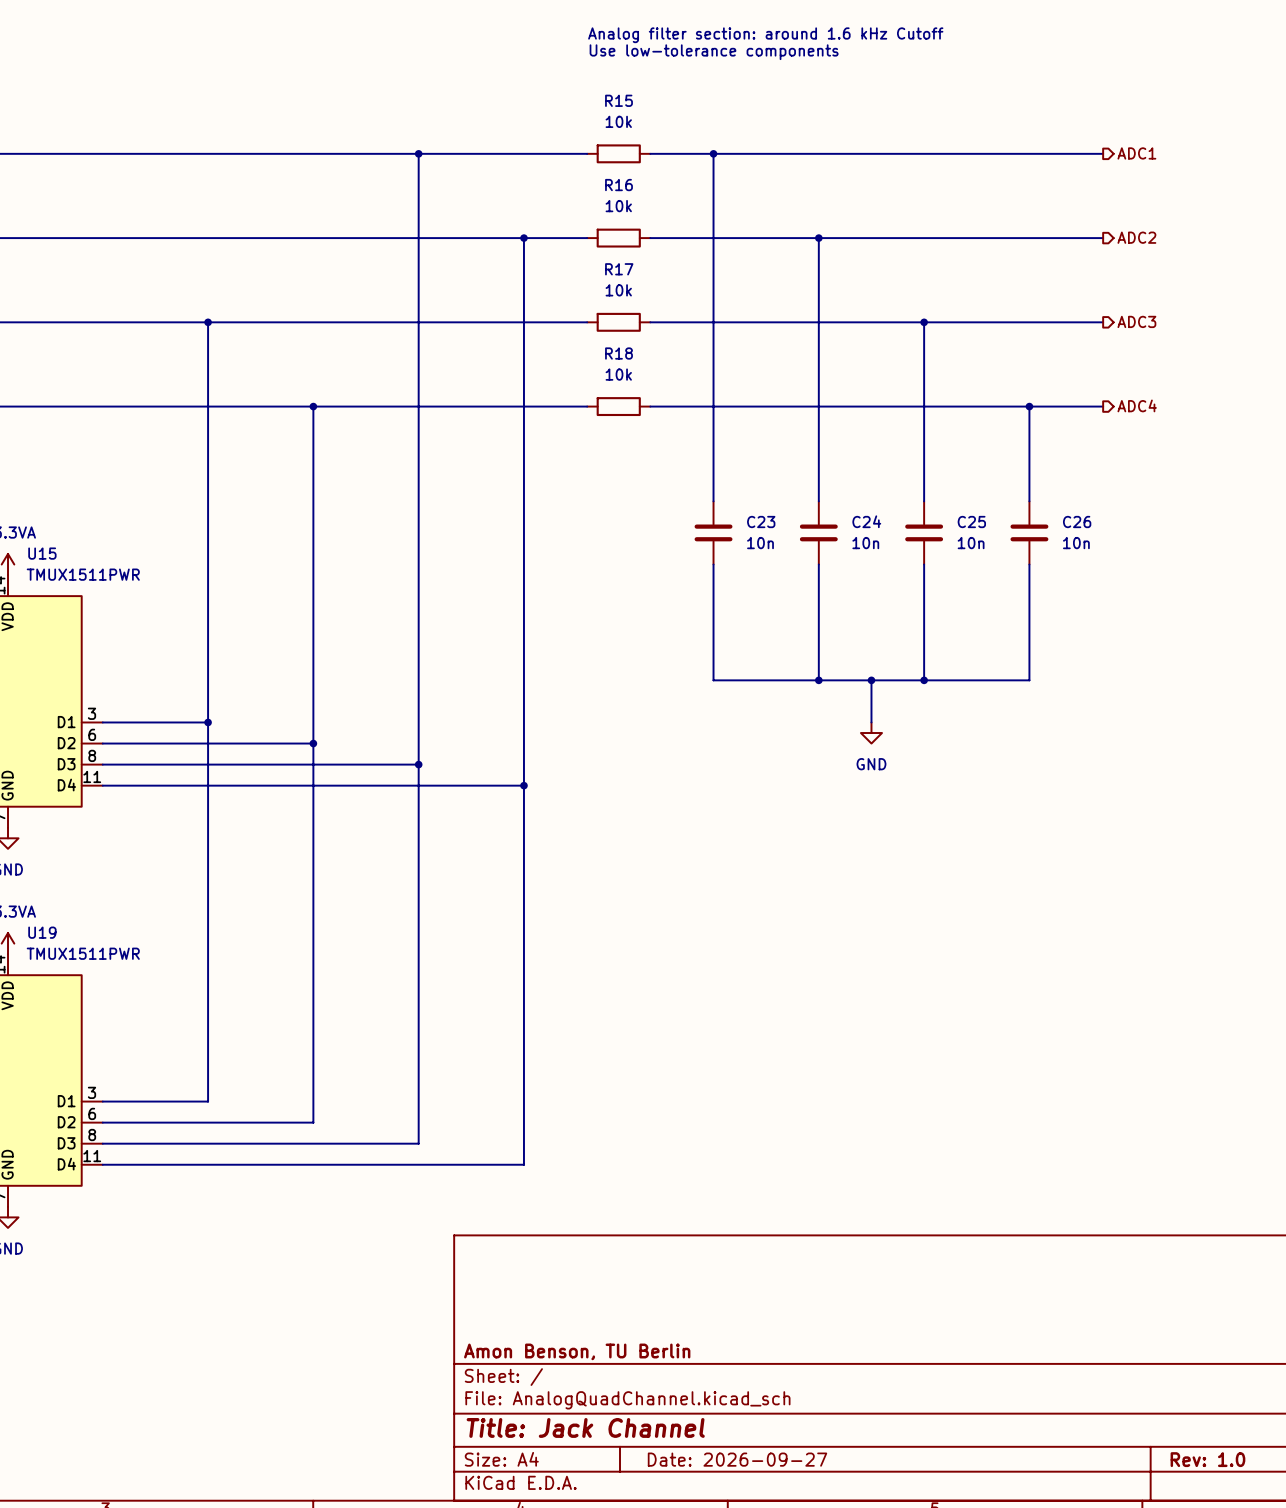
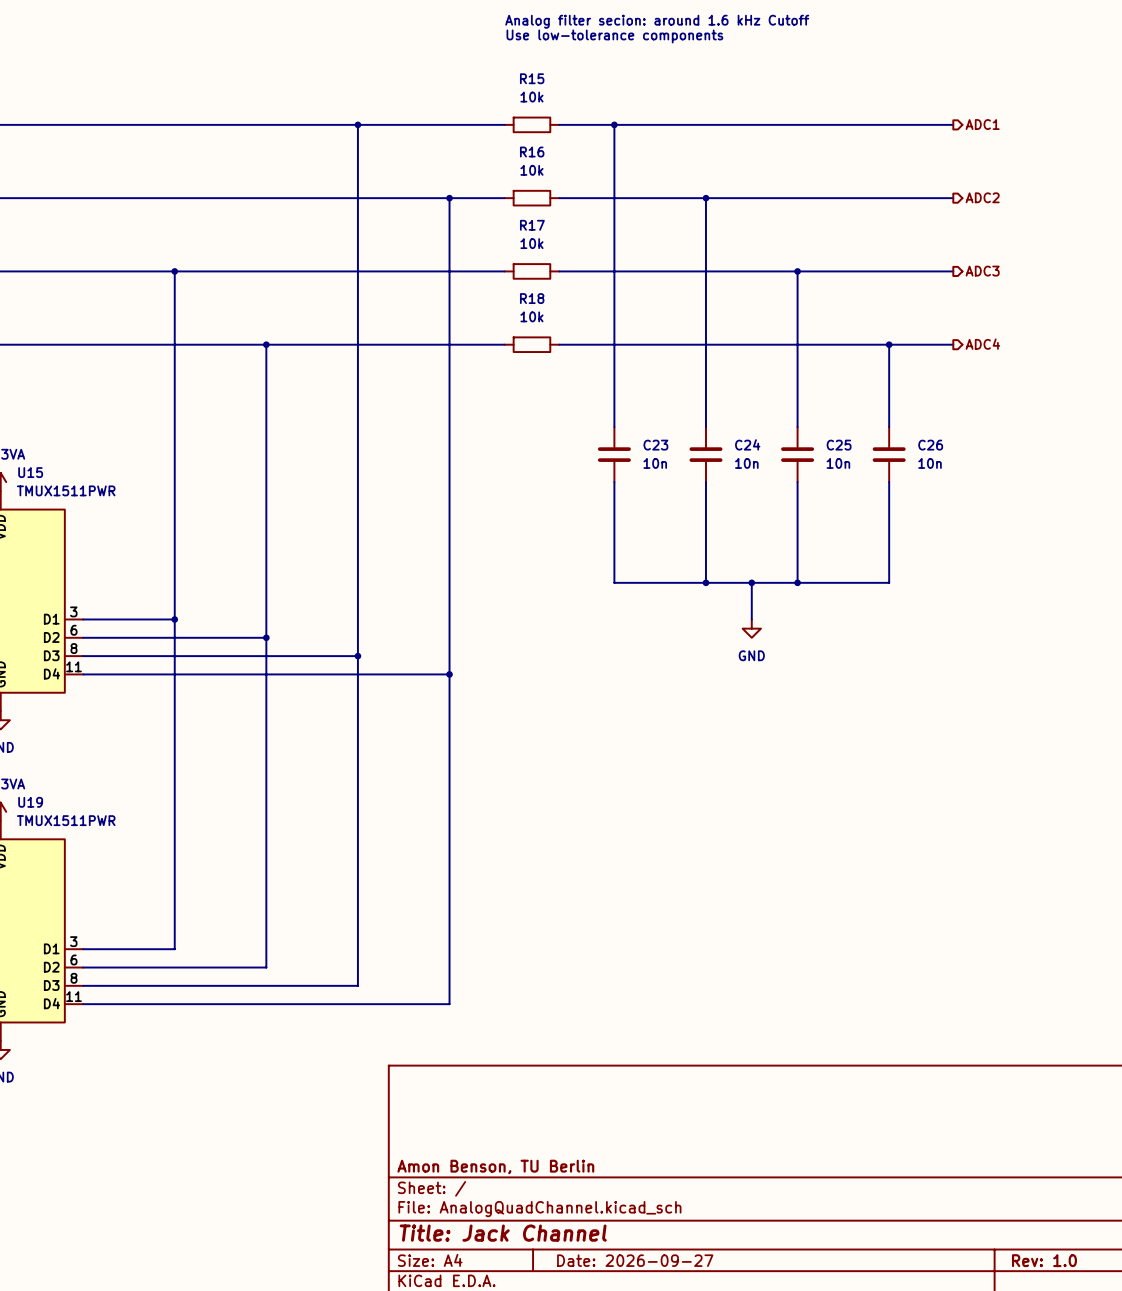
text: Analog filter section: around 1.6 kHz Cutoff (765, 35) -> Analog filter secion: around 1.6 kHz Cutoff (657, 21)

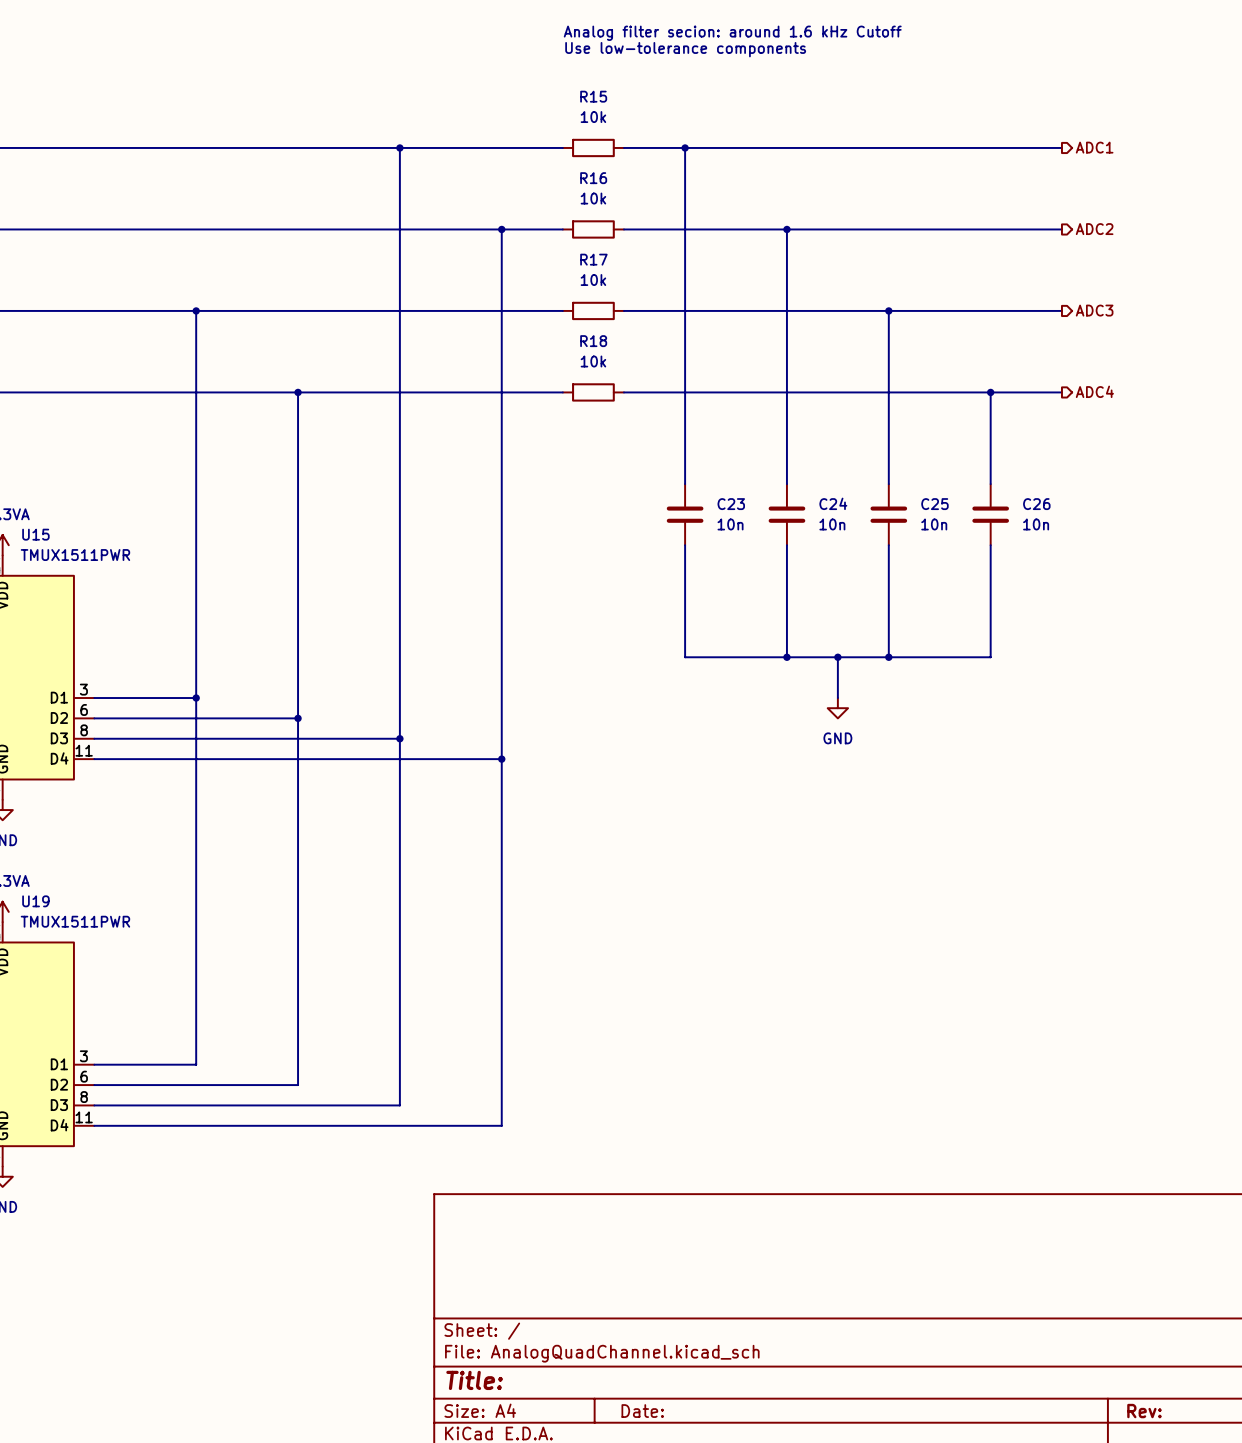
title block: Amon Benson, TU Berlin (495, 1166) -> none
title block: Title: Jack Channel (503, 1233) -> Title: (474, 1380)
title block: Date: 2026-09-27 (635, 1260) -> Date: (642, 1411)
title block: Rev: 1.0 (1044, 1260) -> Rev: (1144, 1411)

